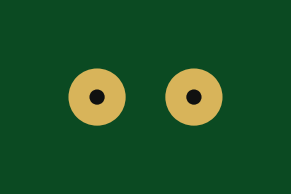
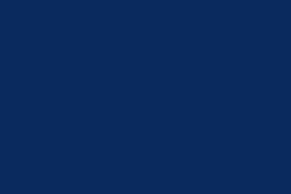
part: (145, 97) -> none

